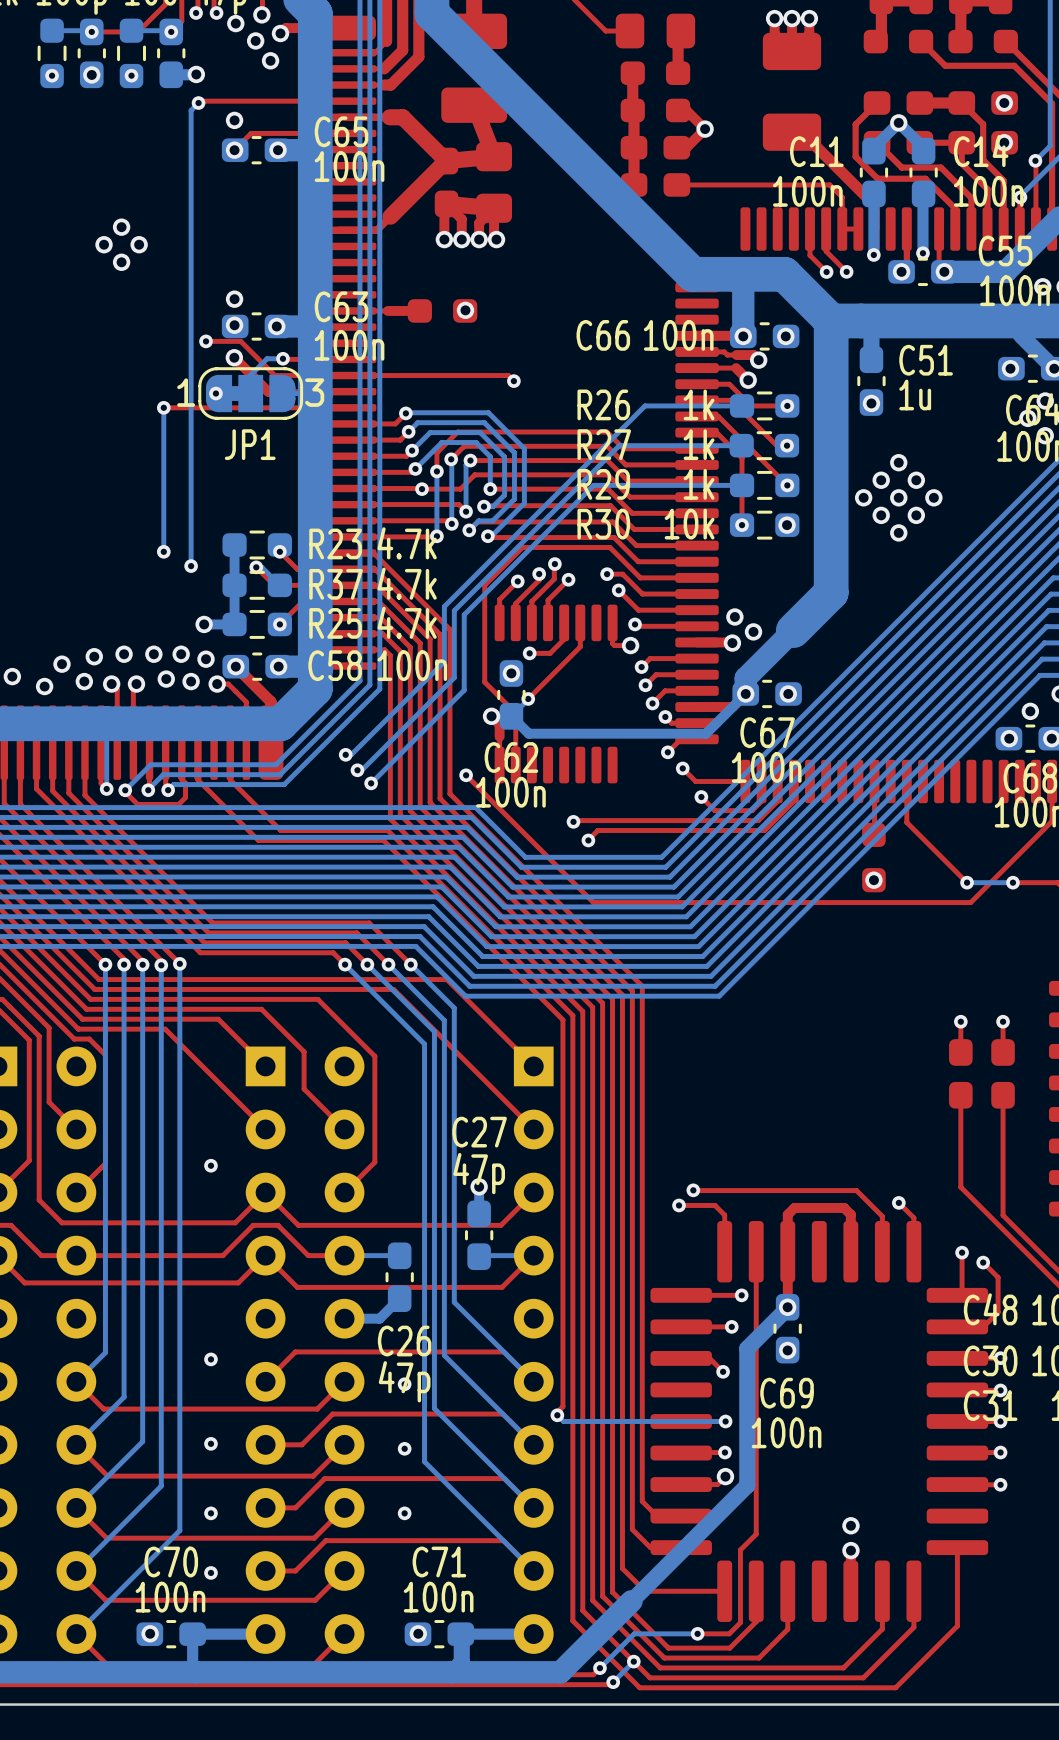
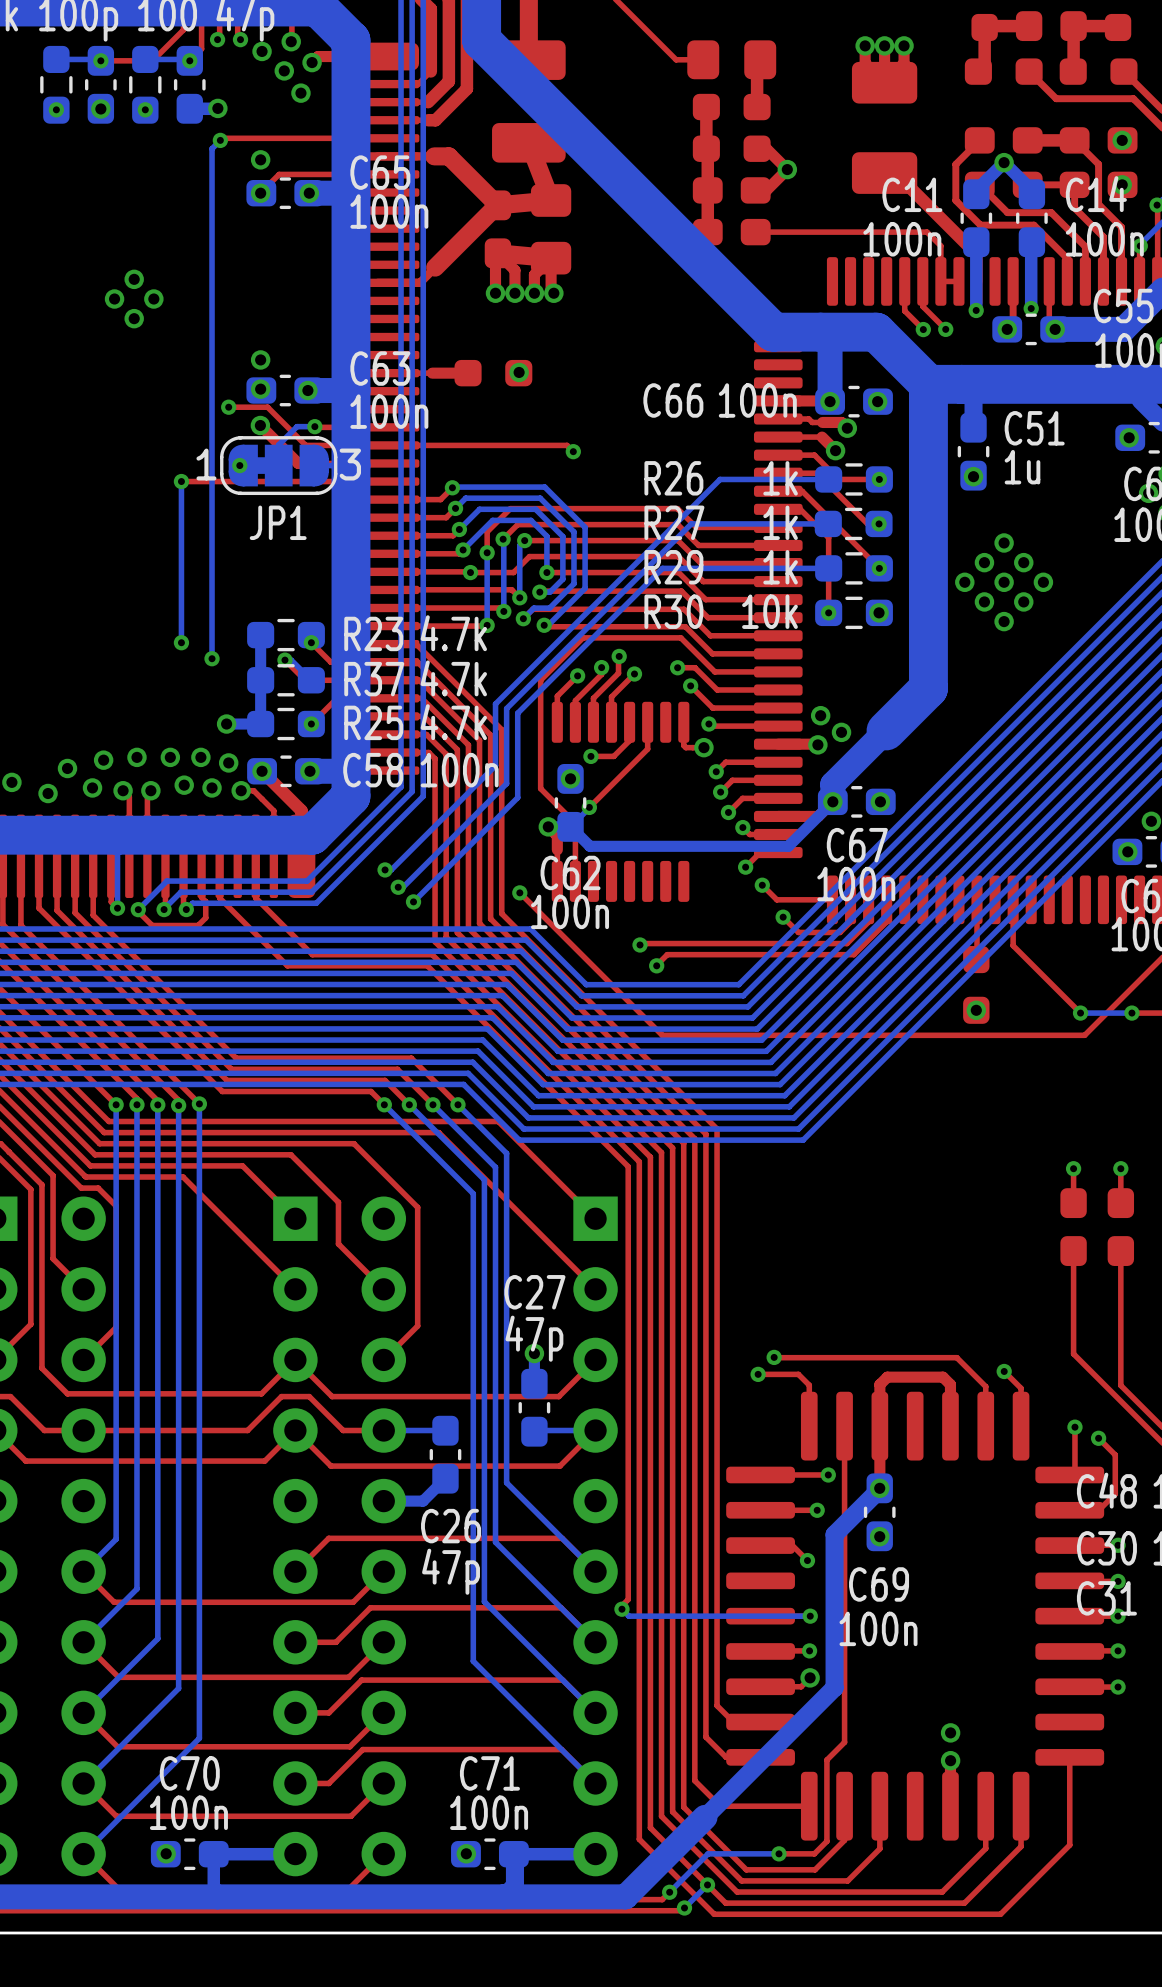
via: (210, 1165) -> none
via: (210, 1359) -> none
via: (404, 1384) -> none
via: (210, 1443) -> none
via: (404, 1448) -> none
via: (210, 1513) -> none
via: (404, 1513) -> none
via: (210, 1572) -> none

